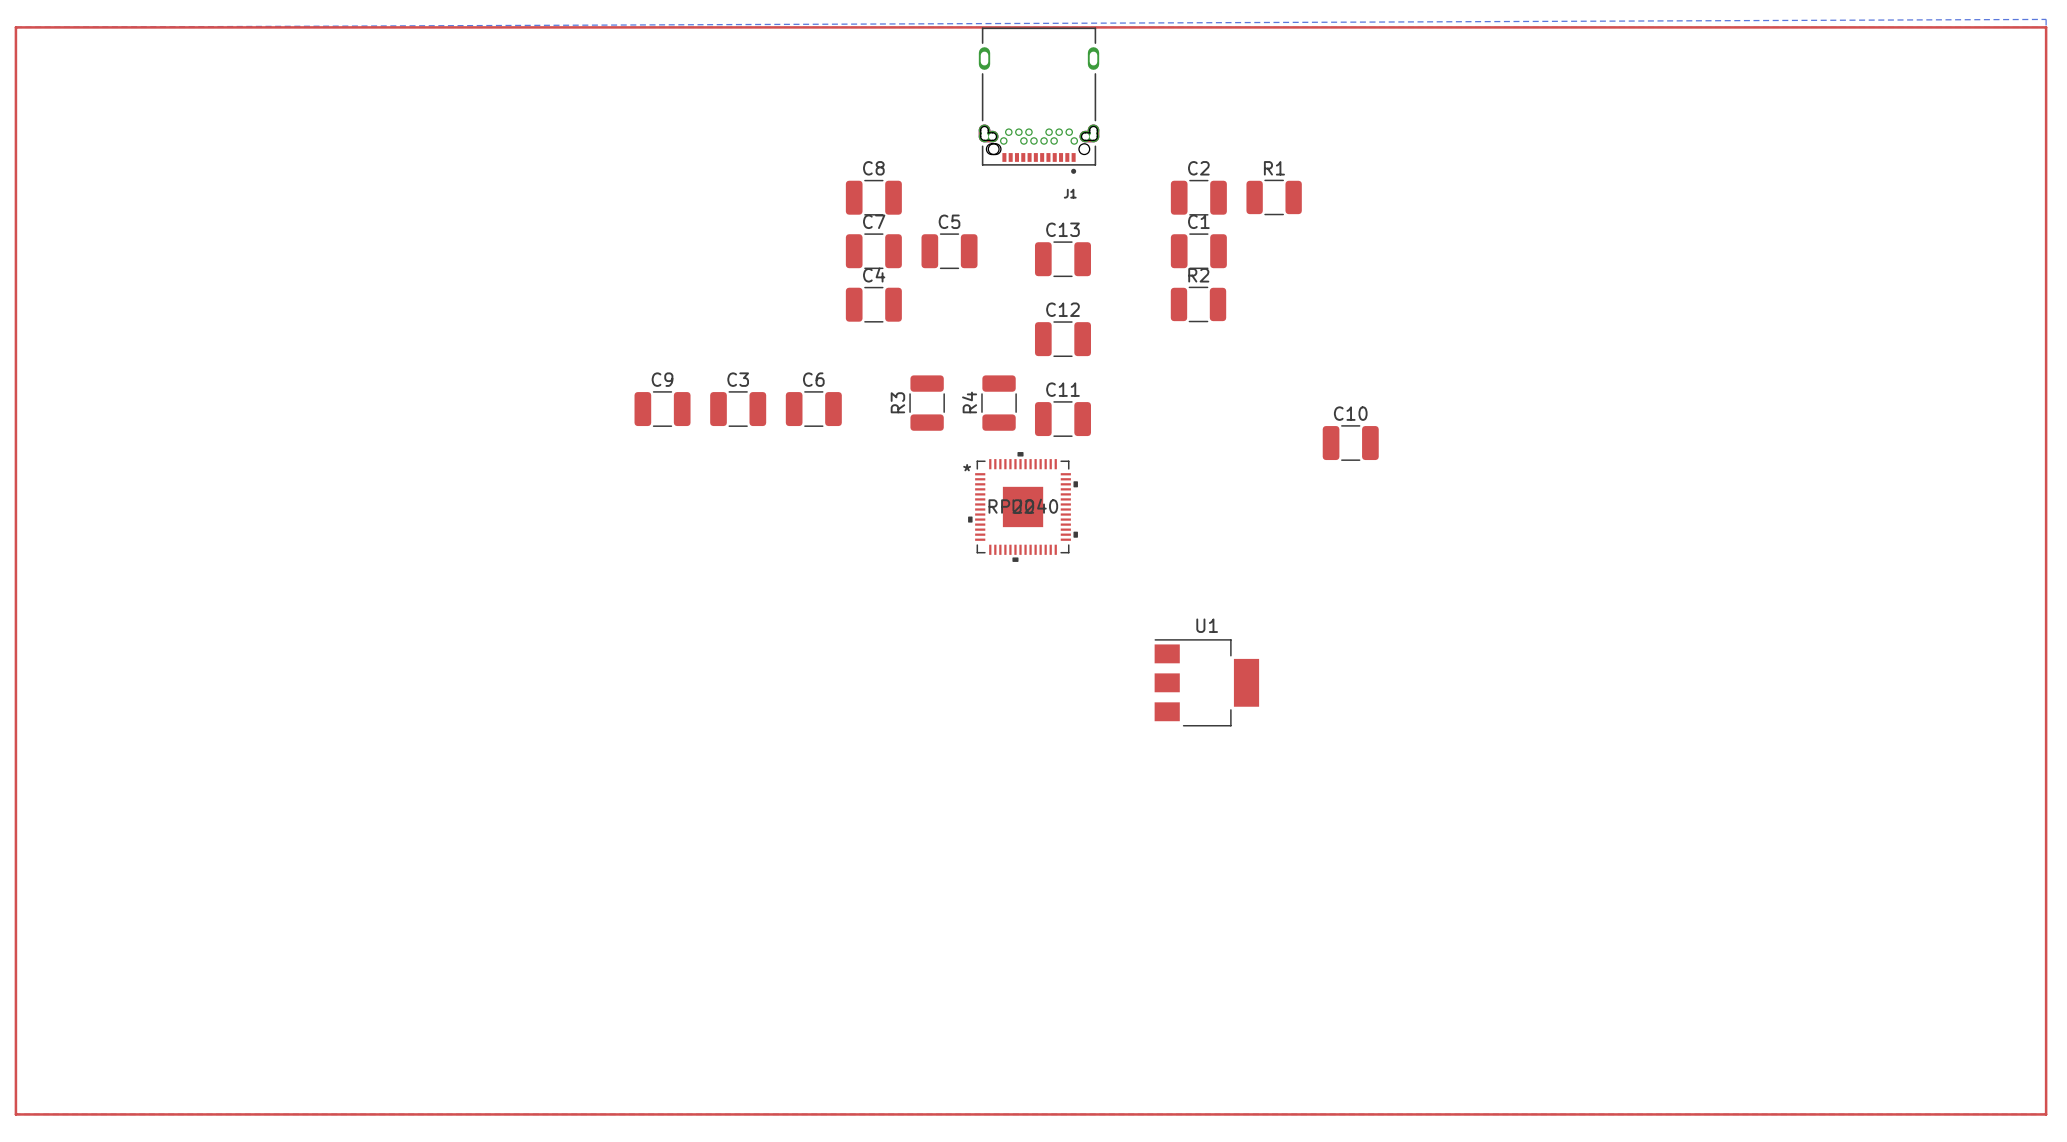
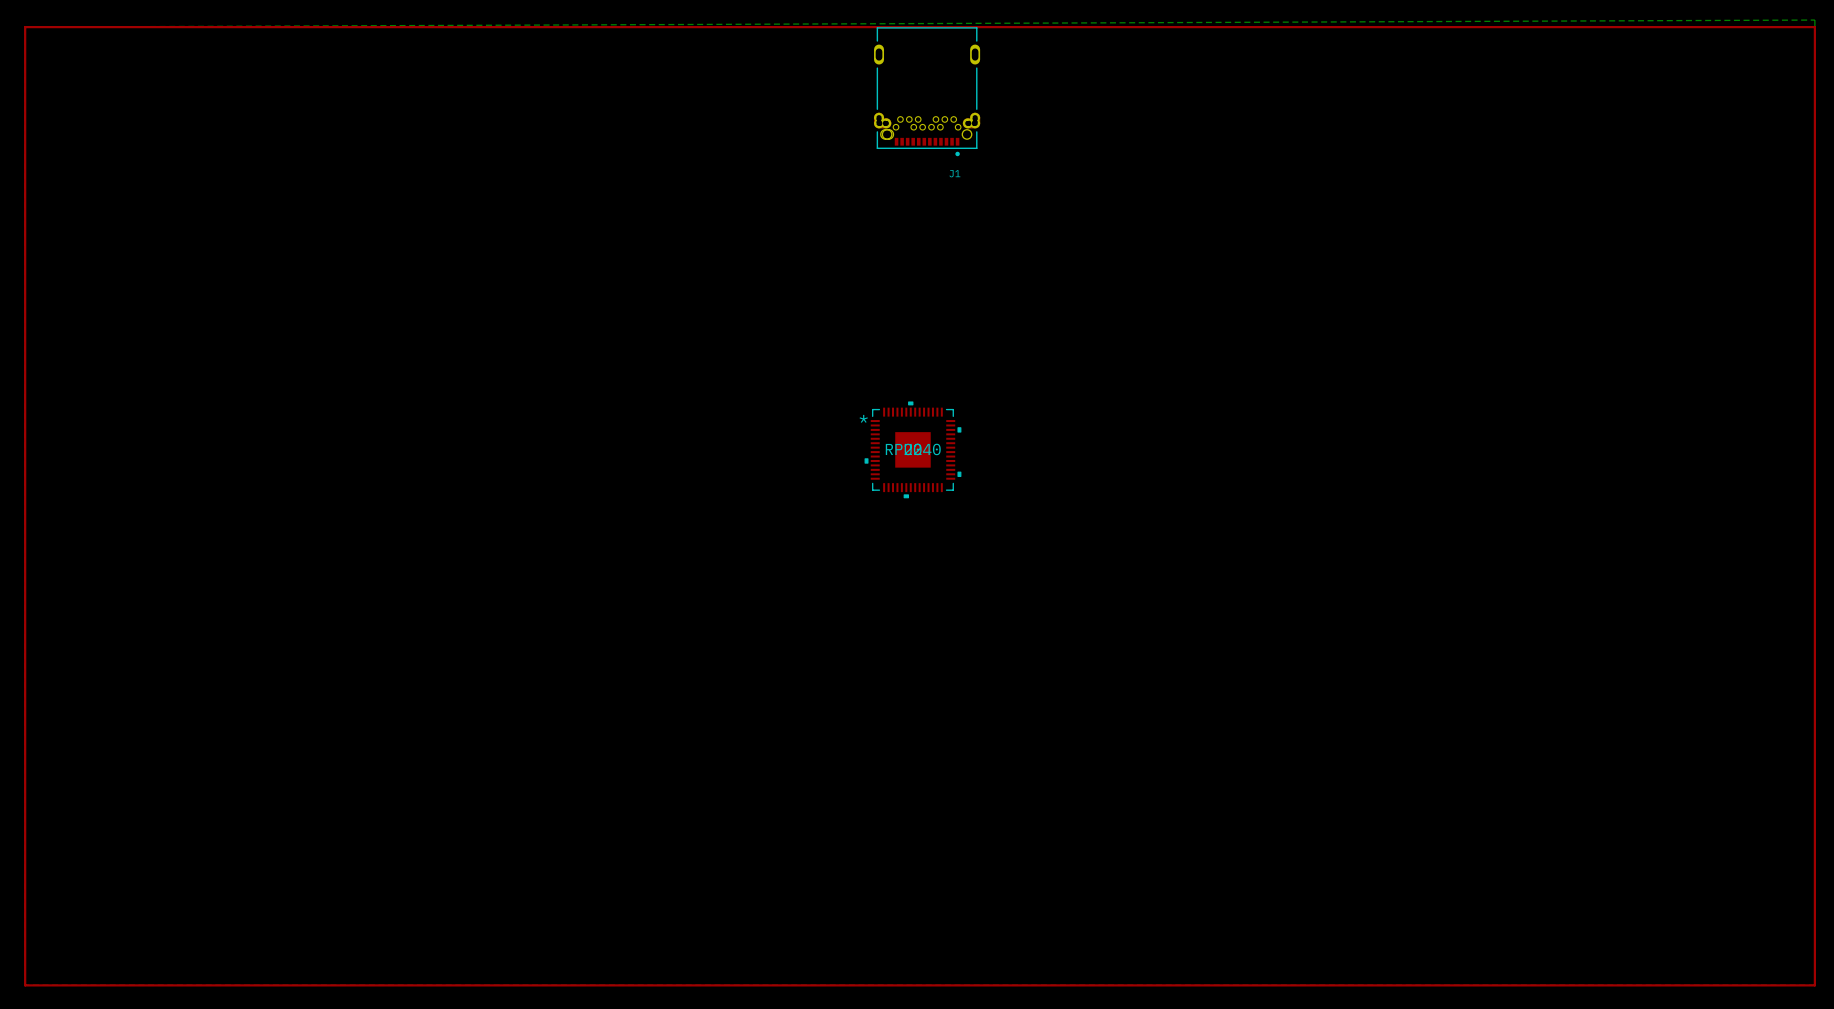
C8: (873, 197) -> none
C2: (1198, 197) -> none
R1: (1274, 197) -> none
C7: (873, 251) -> none
C5: (949, 251) -> none
C1: (1198, 251) -> none
C13: (1062, 259) -> none
C4: (873, 304) -> none
R2: (1198, 304) -> none
C12: (1062, 339) -> none
R3: (927, 403) -> none
R4: (999, 403) -> none
C9: (662, 409) -> none
C3: (738, 409) -> none
C6: (813, 409) -> none
C11: (1062, 419) -> none
C10: (1350, 443) -> none
U1: (1206, 682) -> none

